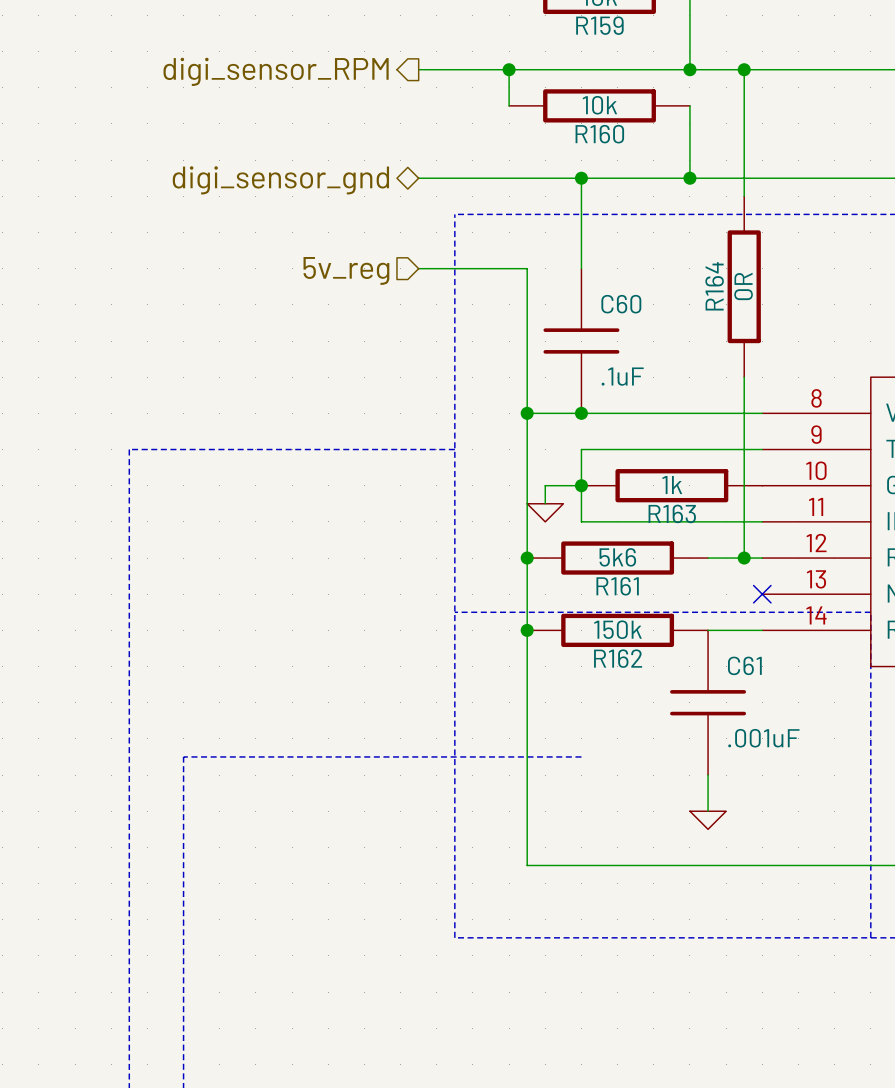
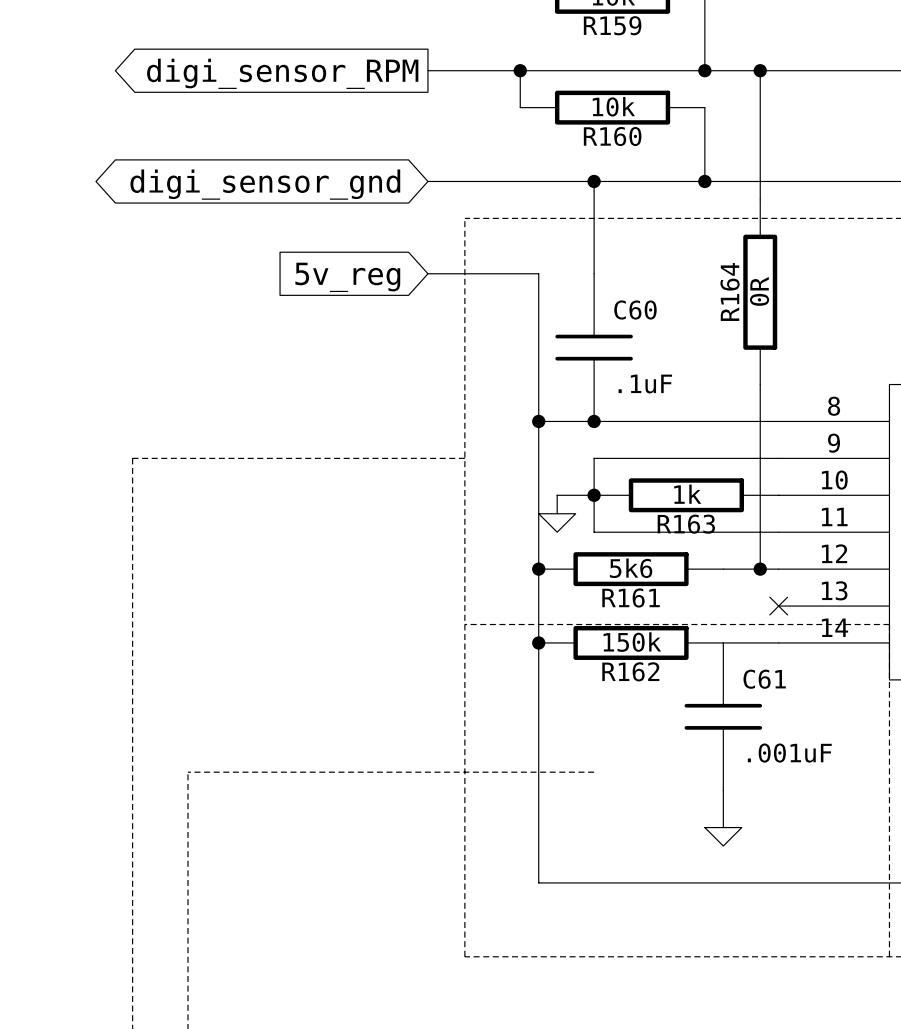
hierarchical label: digi_sensor_RPM (276, 71) -> none
global label: none -> digi_sensor_RPM (282, 73)
hierarchical label: digi_sensor_gnd (280, 180) -> none
global label: none -> digi_sensor_gnd (265, 184)
hierarchical label: 5v_reg (346, 270) -> none
global label: none -> 5v_reg (347, 277)

